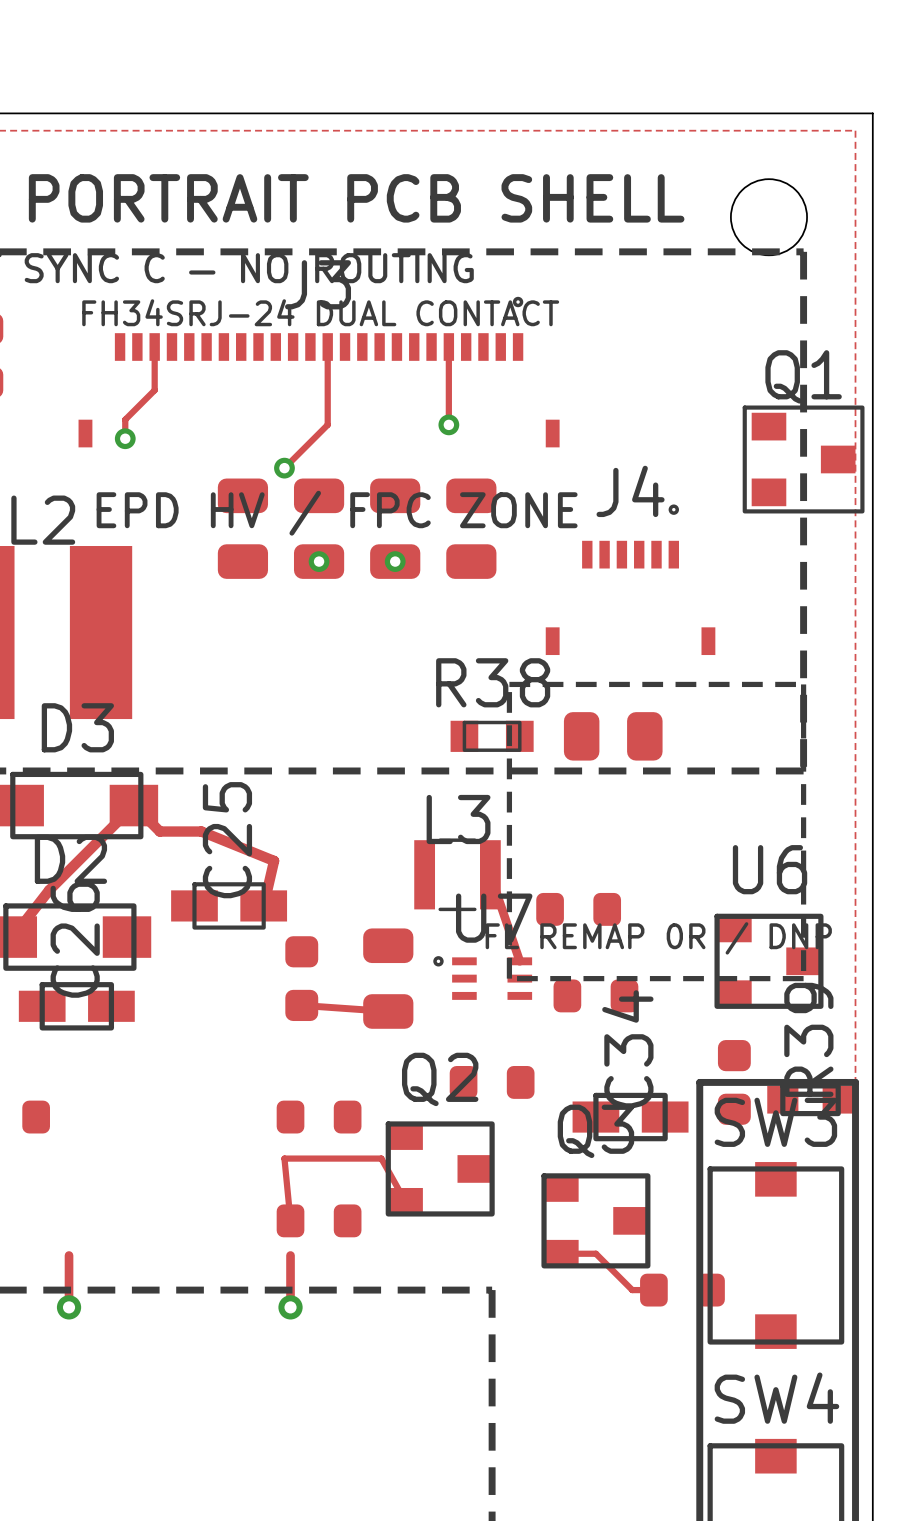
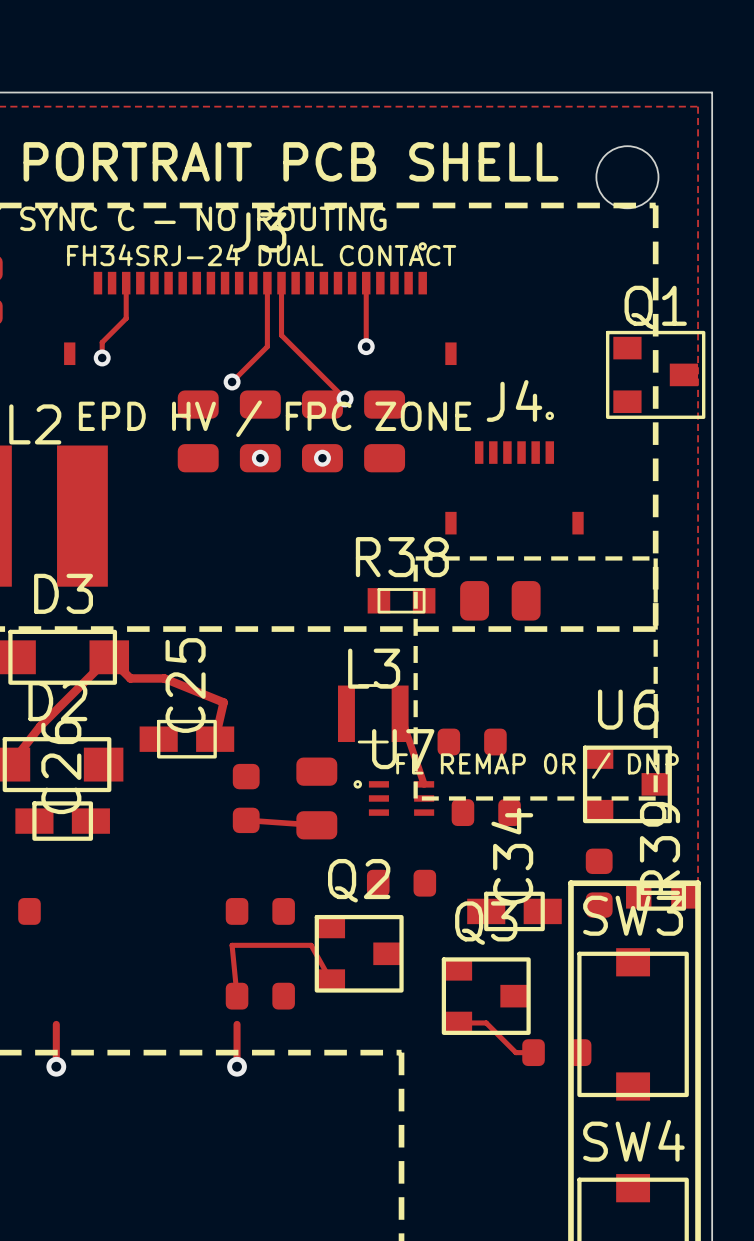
track: none -> (281, 283) (281, 335) (345, 398)
via: none -> (345, 398)

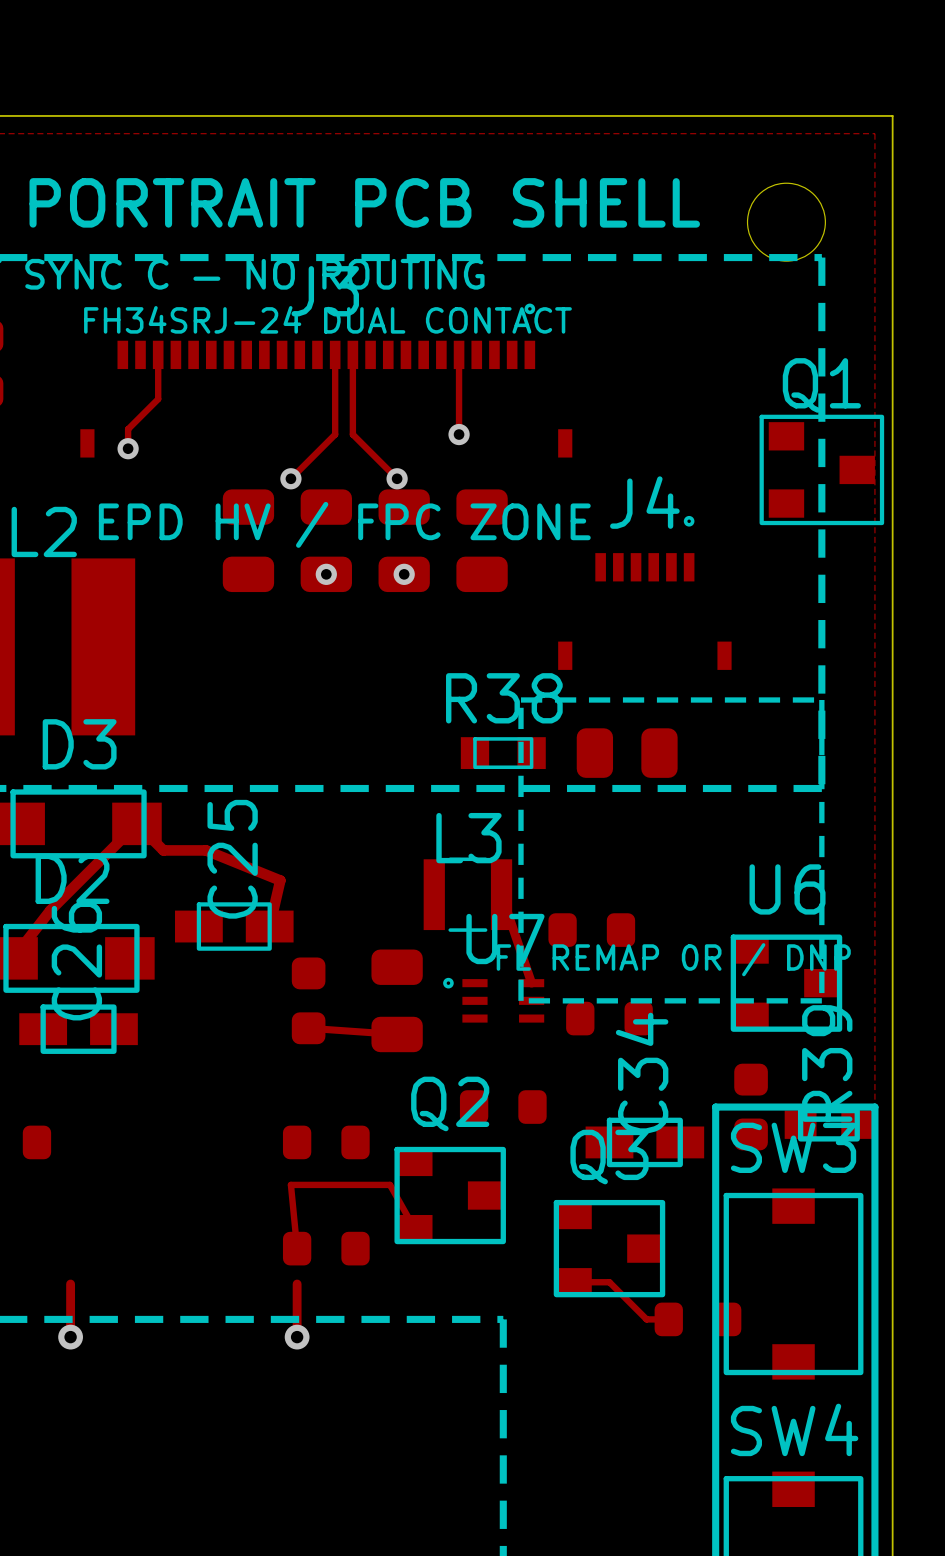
track: (281, 335) (345, 398) -> (352, 420) (352, 434) (397, 478)
via: none -> (397, 478)
via: (345, 398) -> none

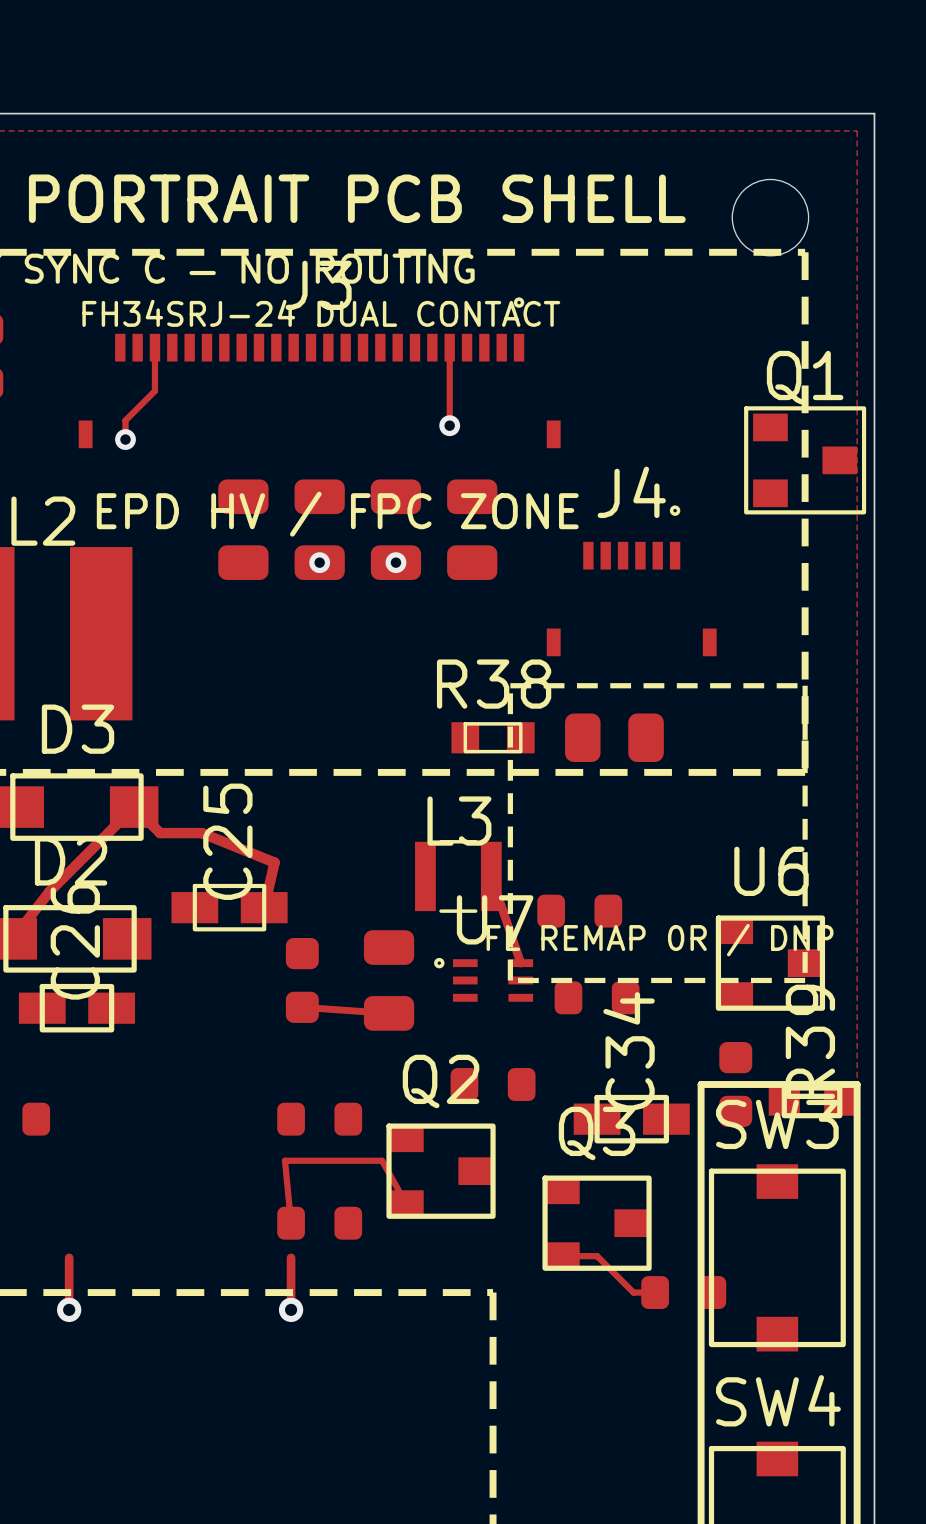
track: (335, 354) (335, 434) (290, 478) -> none
track: (352, 354) (352, 434) (397, 478) -> none
via: (290, 478) -> none
via: (397, 478) -> none

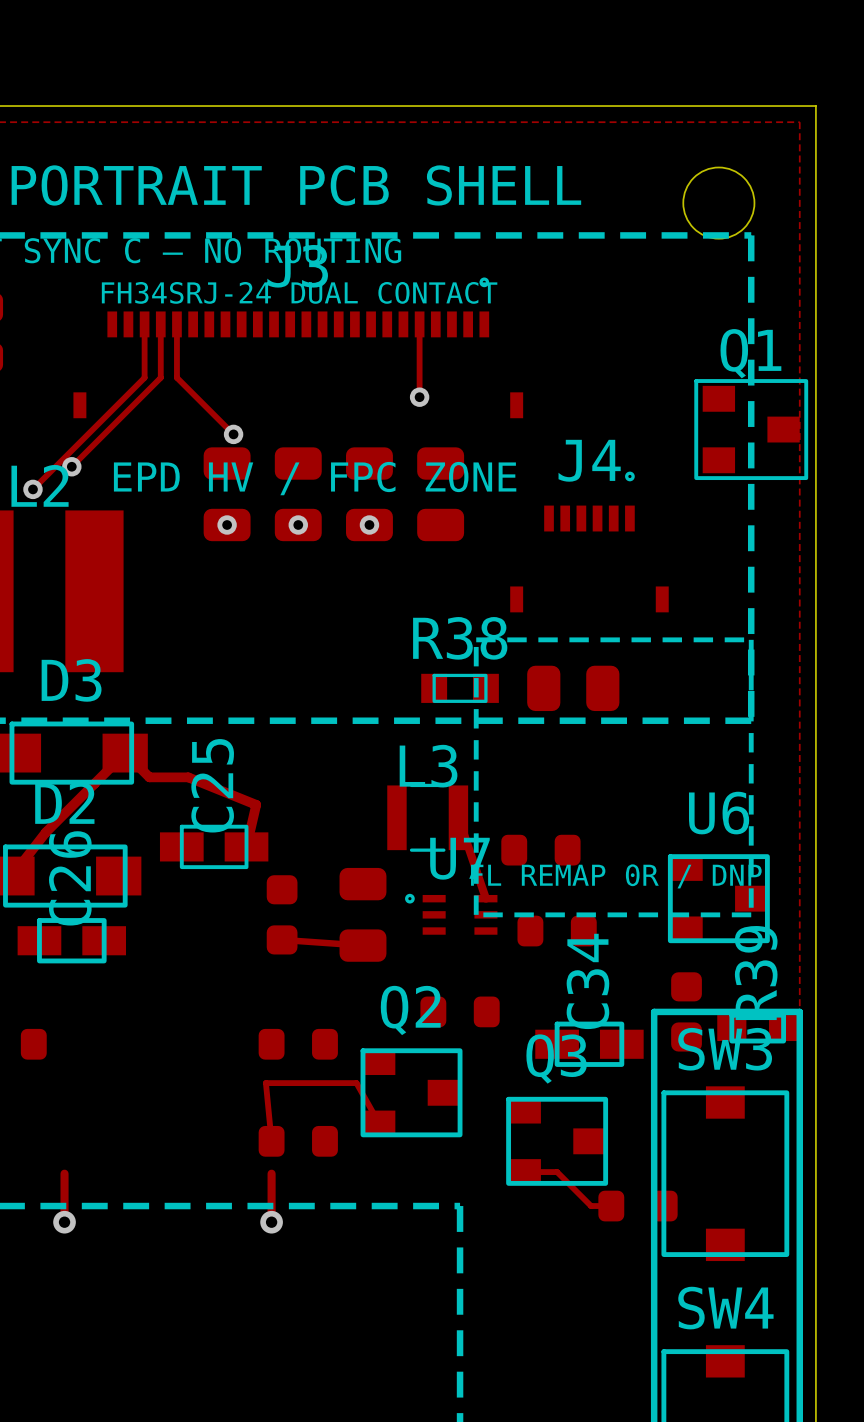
track: none -> (160, 324) (160, 377) (71, 466)
track: none -> (176, 324) (176, 377) (233, 434)
track: (154, 391) (125, 420) (125, 439) -> (144, 364) (144, 377) (32, 489)
via: (125, 439) -> none
via: none -> (233, 434)
via: none -> (71, 466)
via: none -> (32, 489)
via: none -> (227, 524)

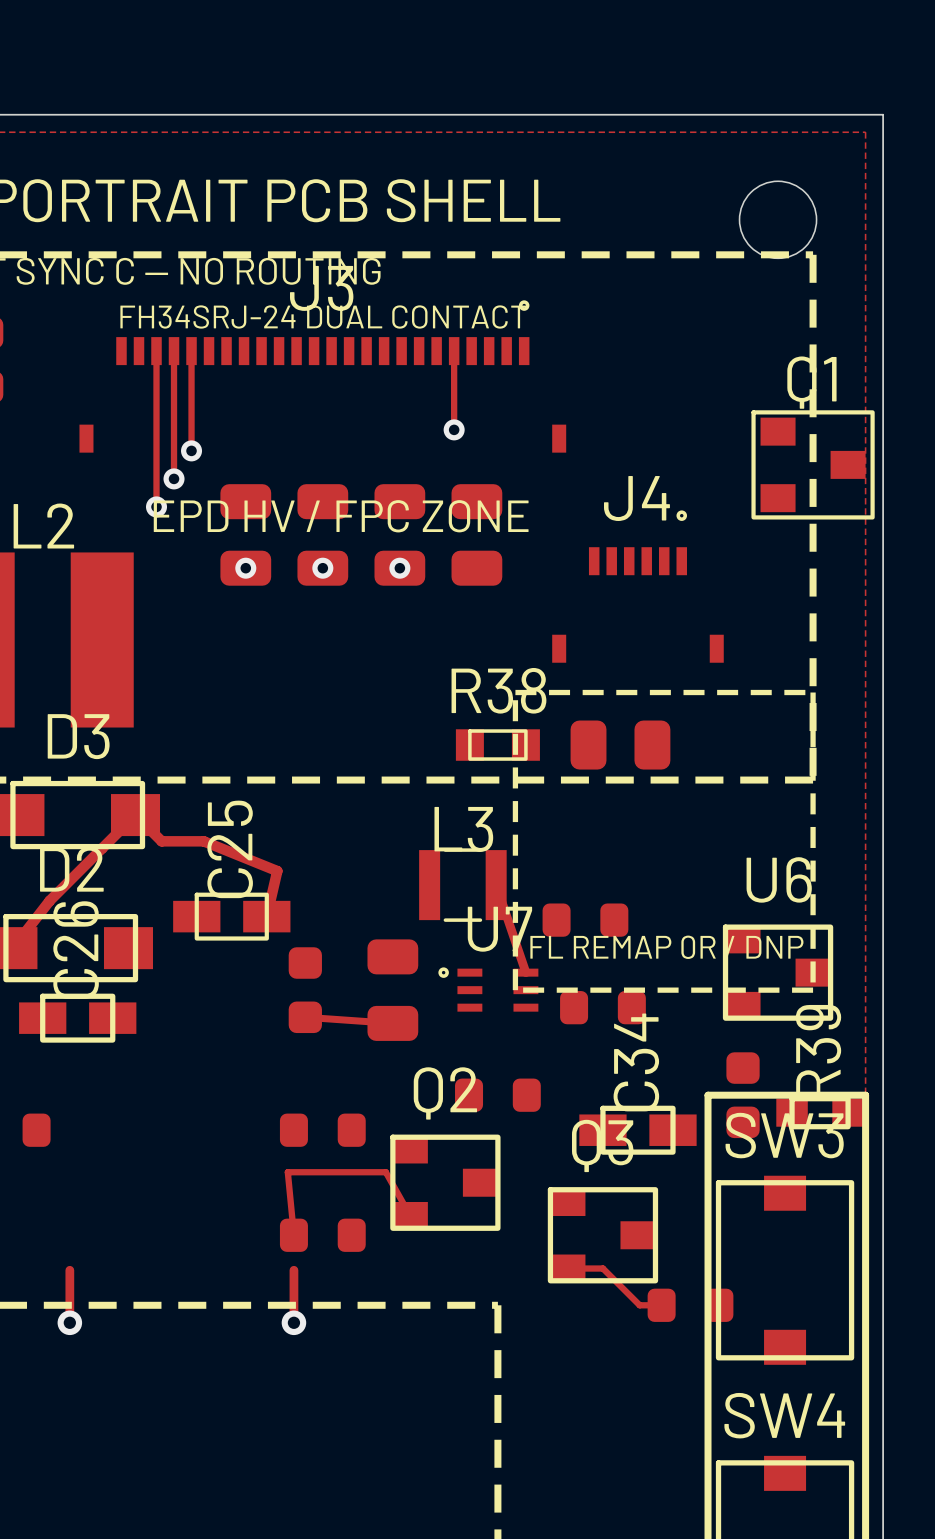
track: (144, 377) (32, 489) -> (156, 408) (156, 506)
track: (160, 377) (71, 466) -> (174, 408) (174, 478)
track: (176, 377) (233, 434) -> (191, 408) (191, 450)
via position: (233, 434) -> (191, 450)
via: none -> (174, 478)
via: (71, 466) -> none
via: none -> (156, 506)
via: (32, 489) -> none

